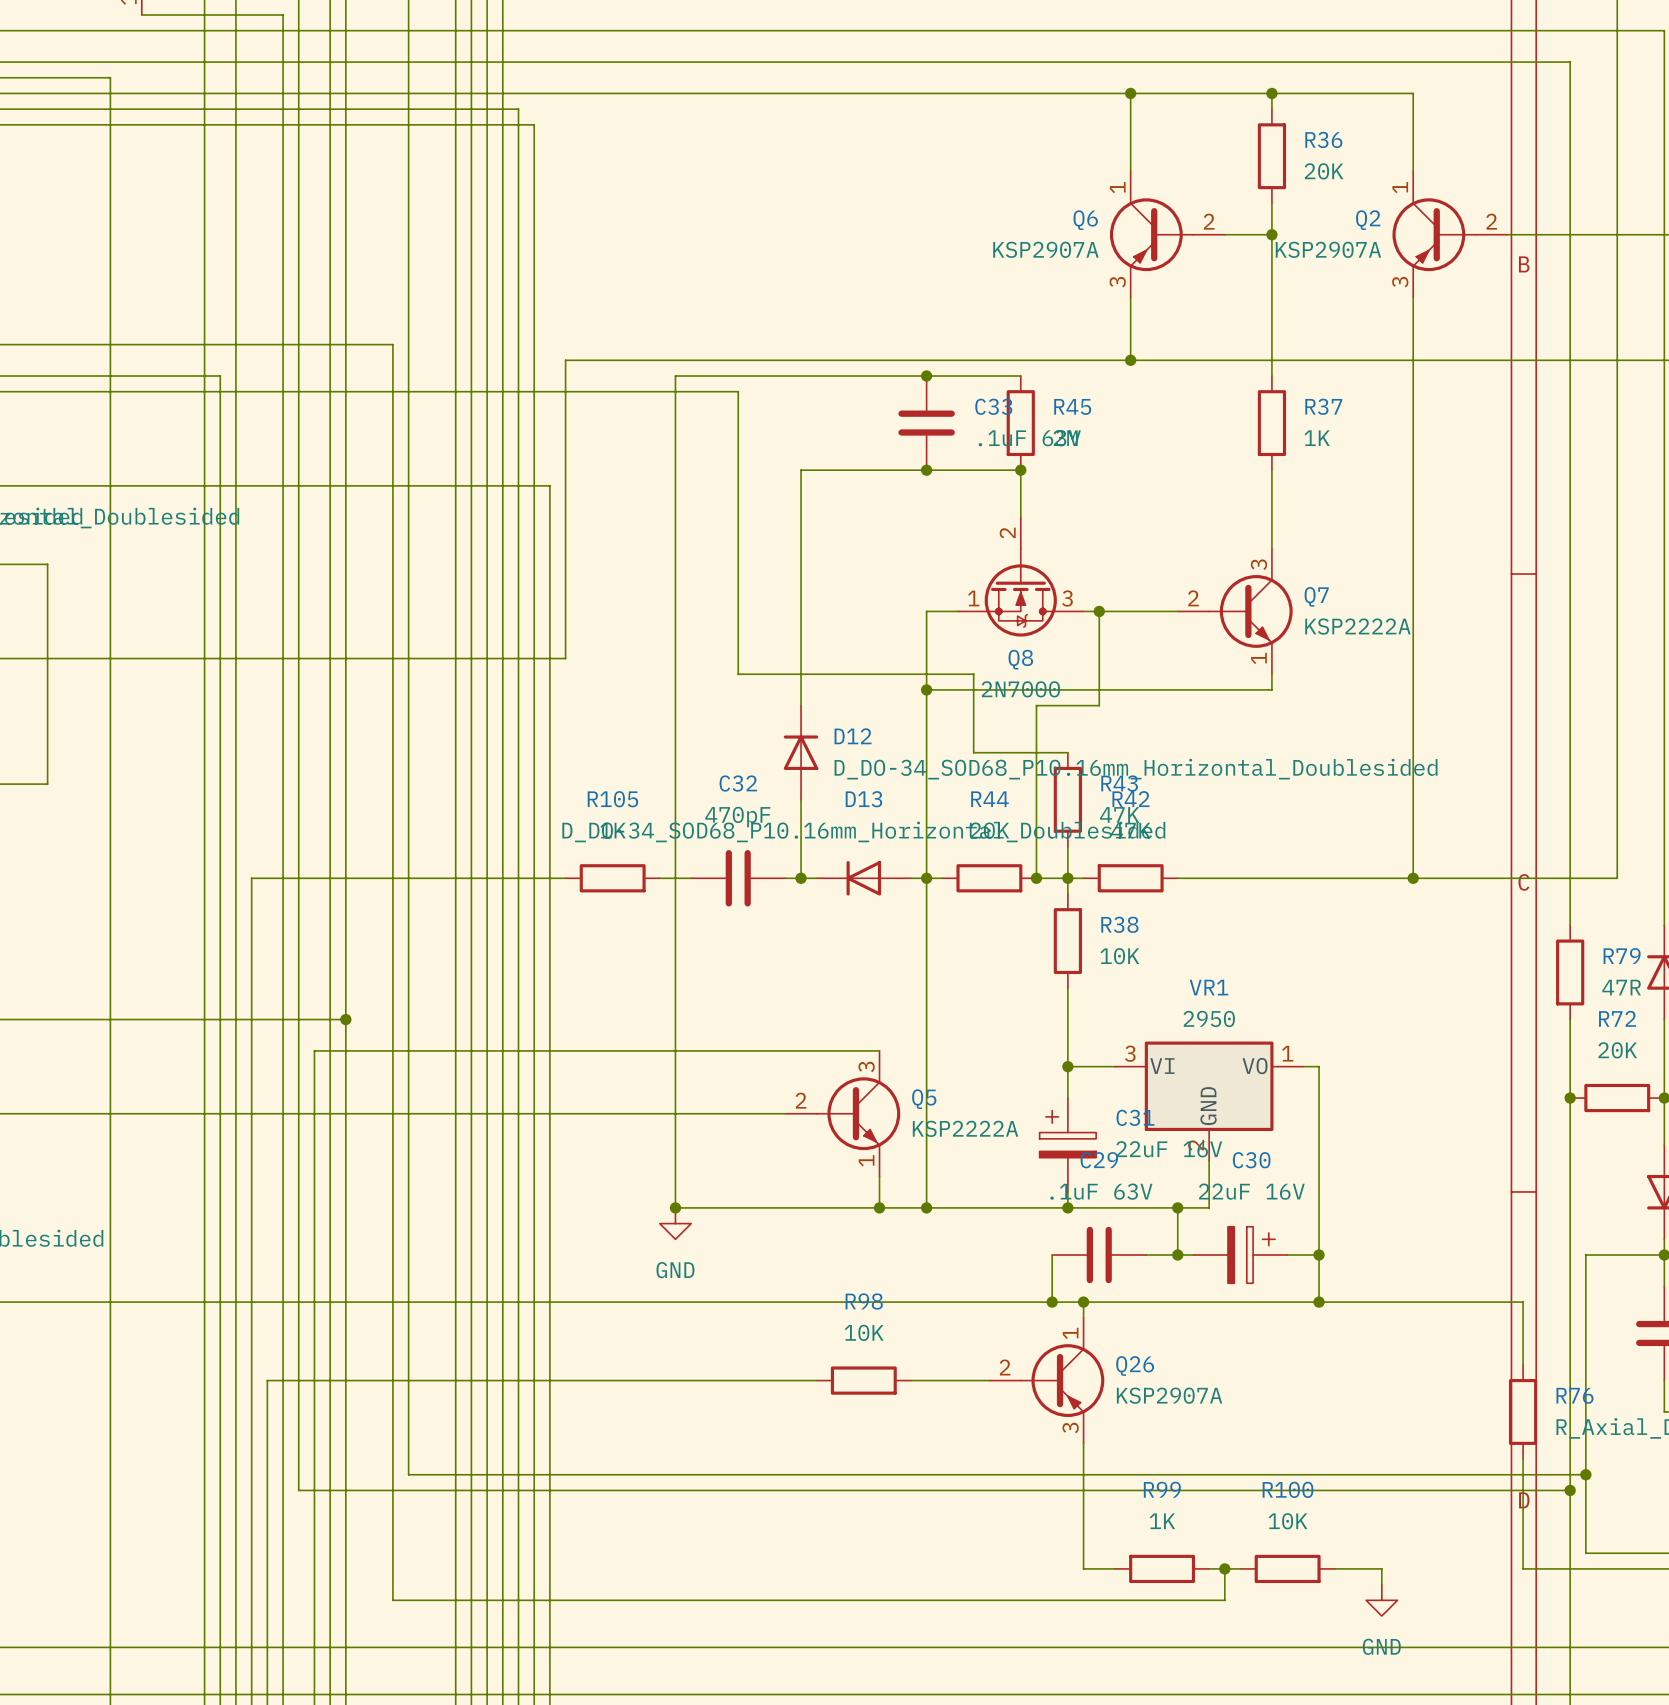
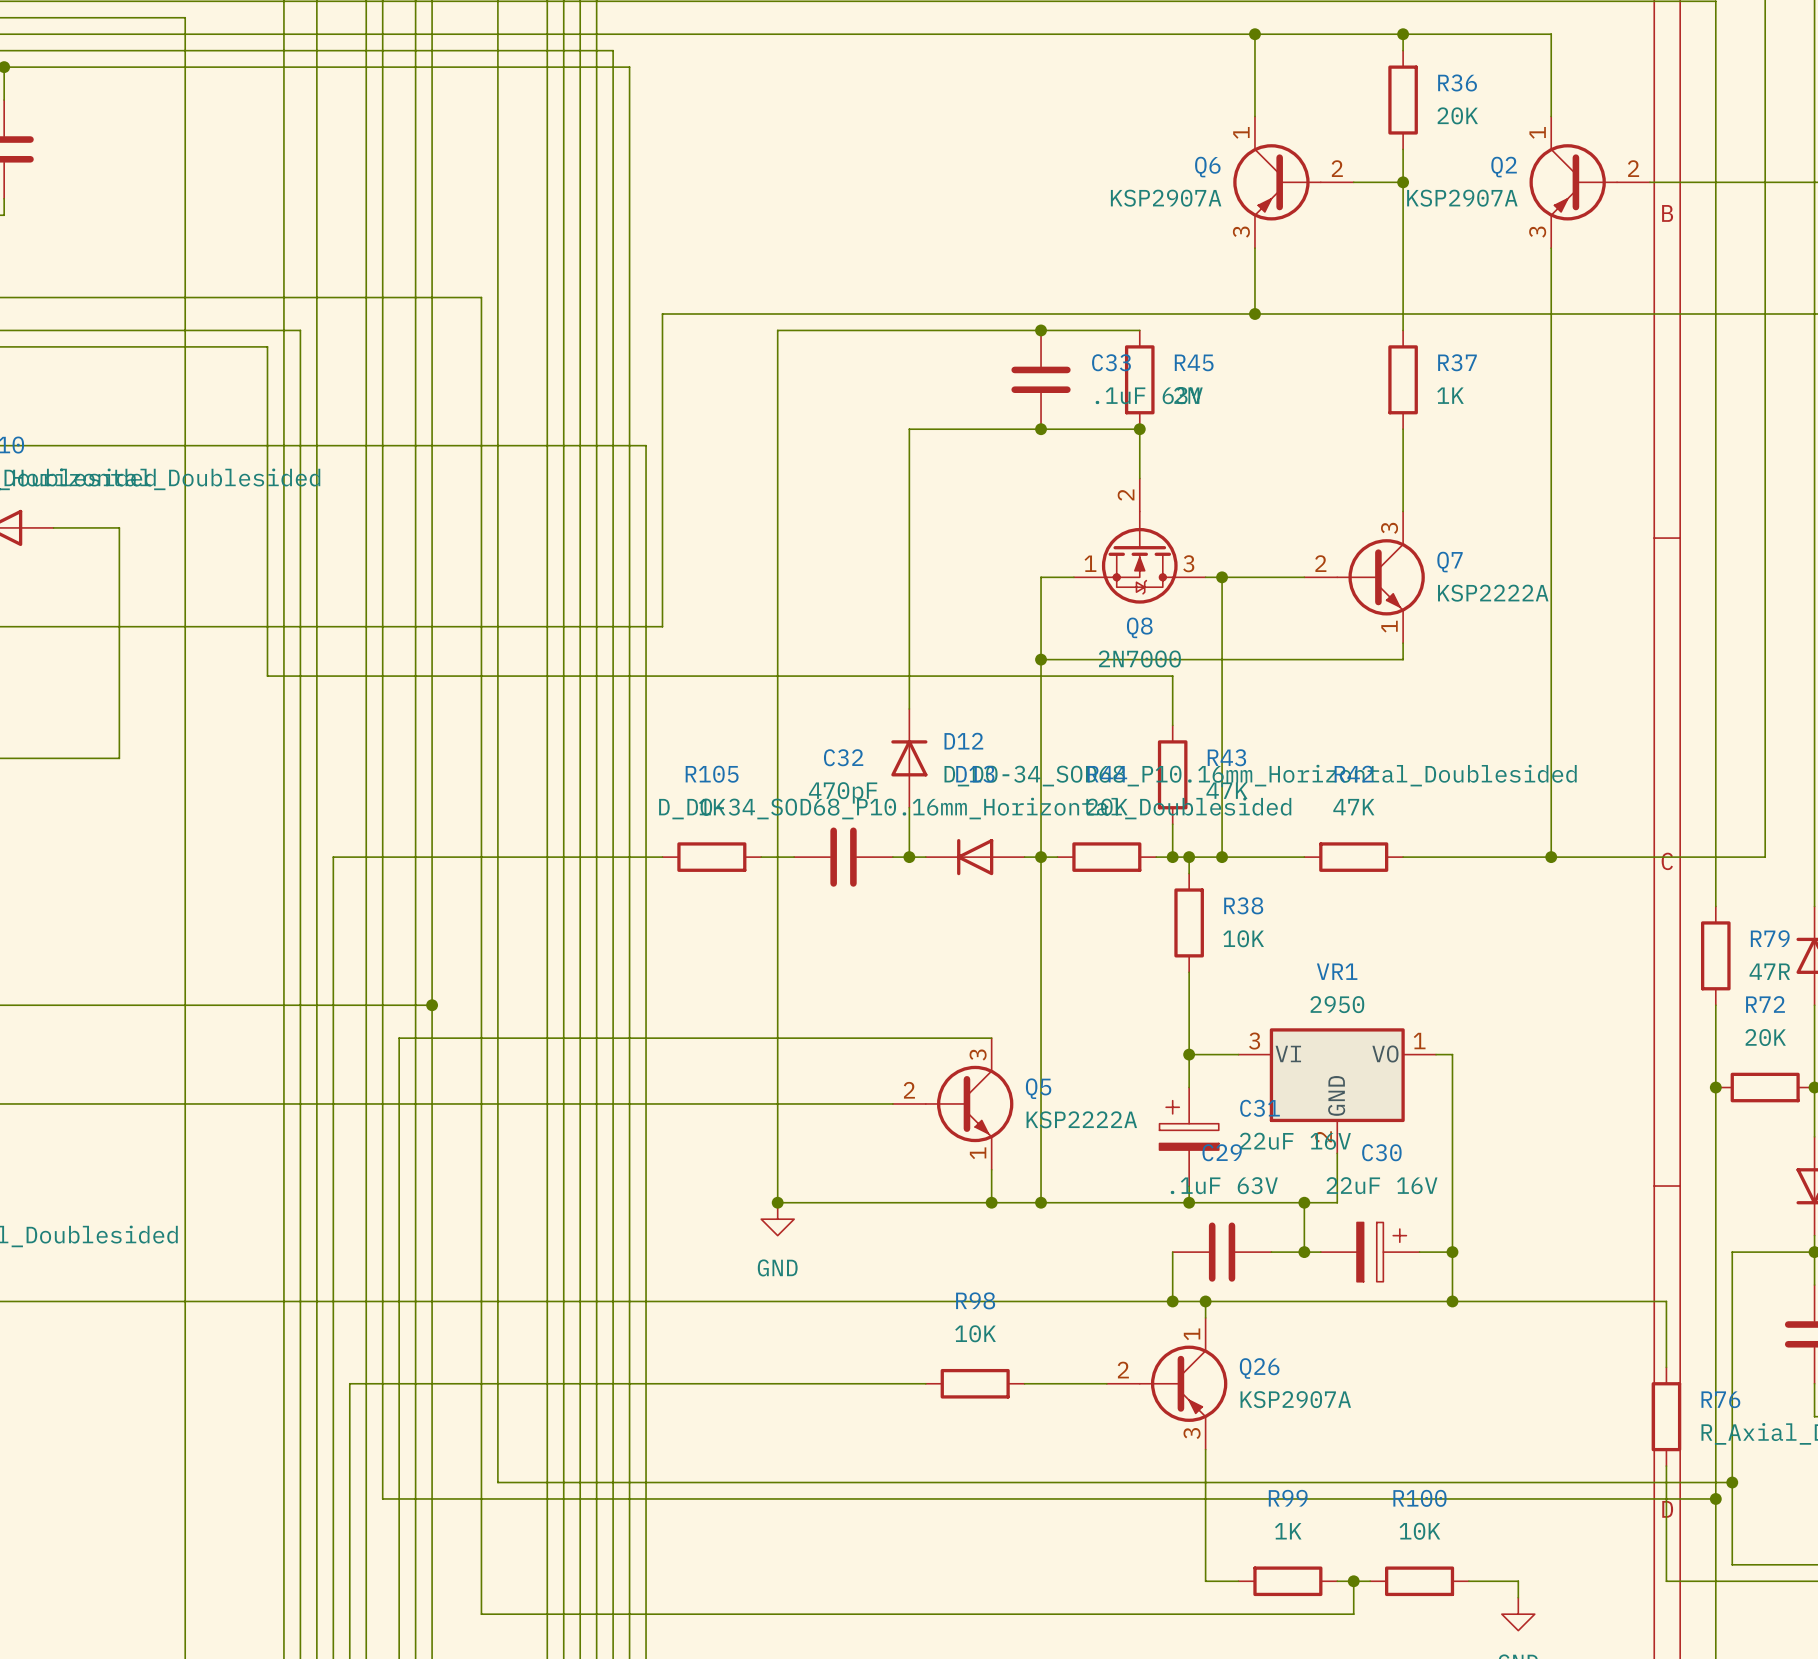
wire: (188, 391) (738, 391) (738, 674) (973, 674) (973, 752) (1067, 752) -> (267, 346) (267, 676) (1156, 676)
wire: (1036, 705) (1036, 878) -> (1222, 676) (1222, 857)
wire: (1052, 705) (1099, 705) -> (1172, 676) (1172, 725)
D12 position: (801, 752) -> (909, 758)
R43 position: (1067, 799) -> (1172, 774)
wire: (1067, 846) (1067, 878) -> (1172, 824) (1172, 857)
junction position: (1036, 878) -> (1172, 857)
junction: none -> (1222, 857)
R42 position: (1130, 878) -> (1353, 857)
wire: (1177, 878) (1271, 878) -> (1304, 857) (1205, 857)

